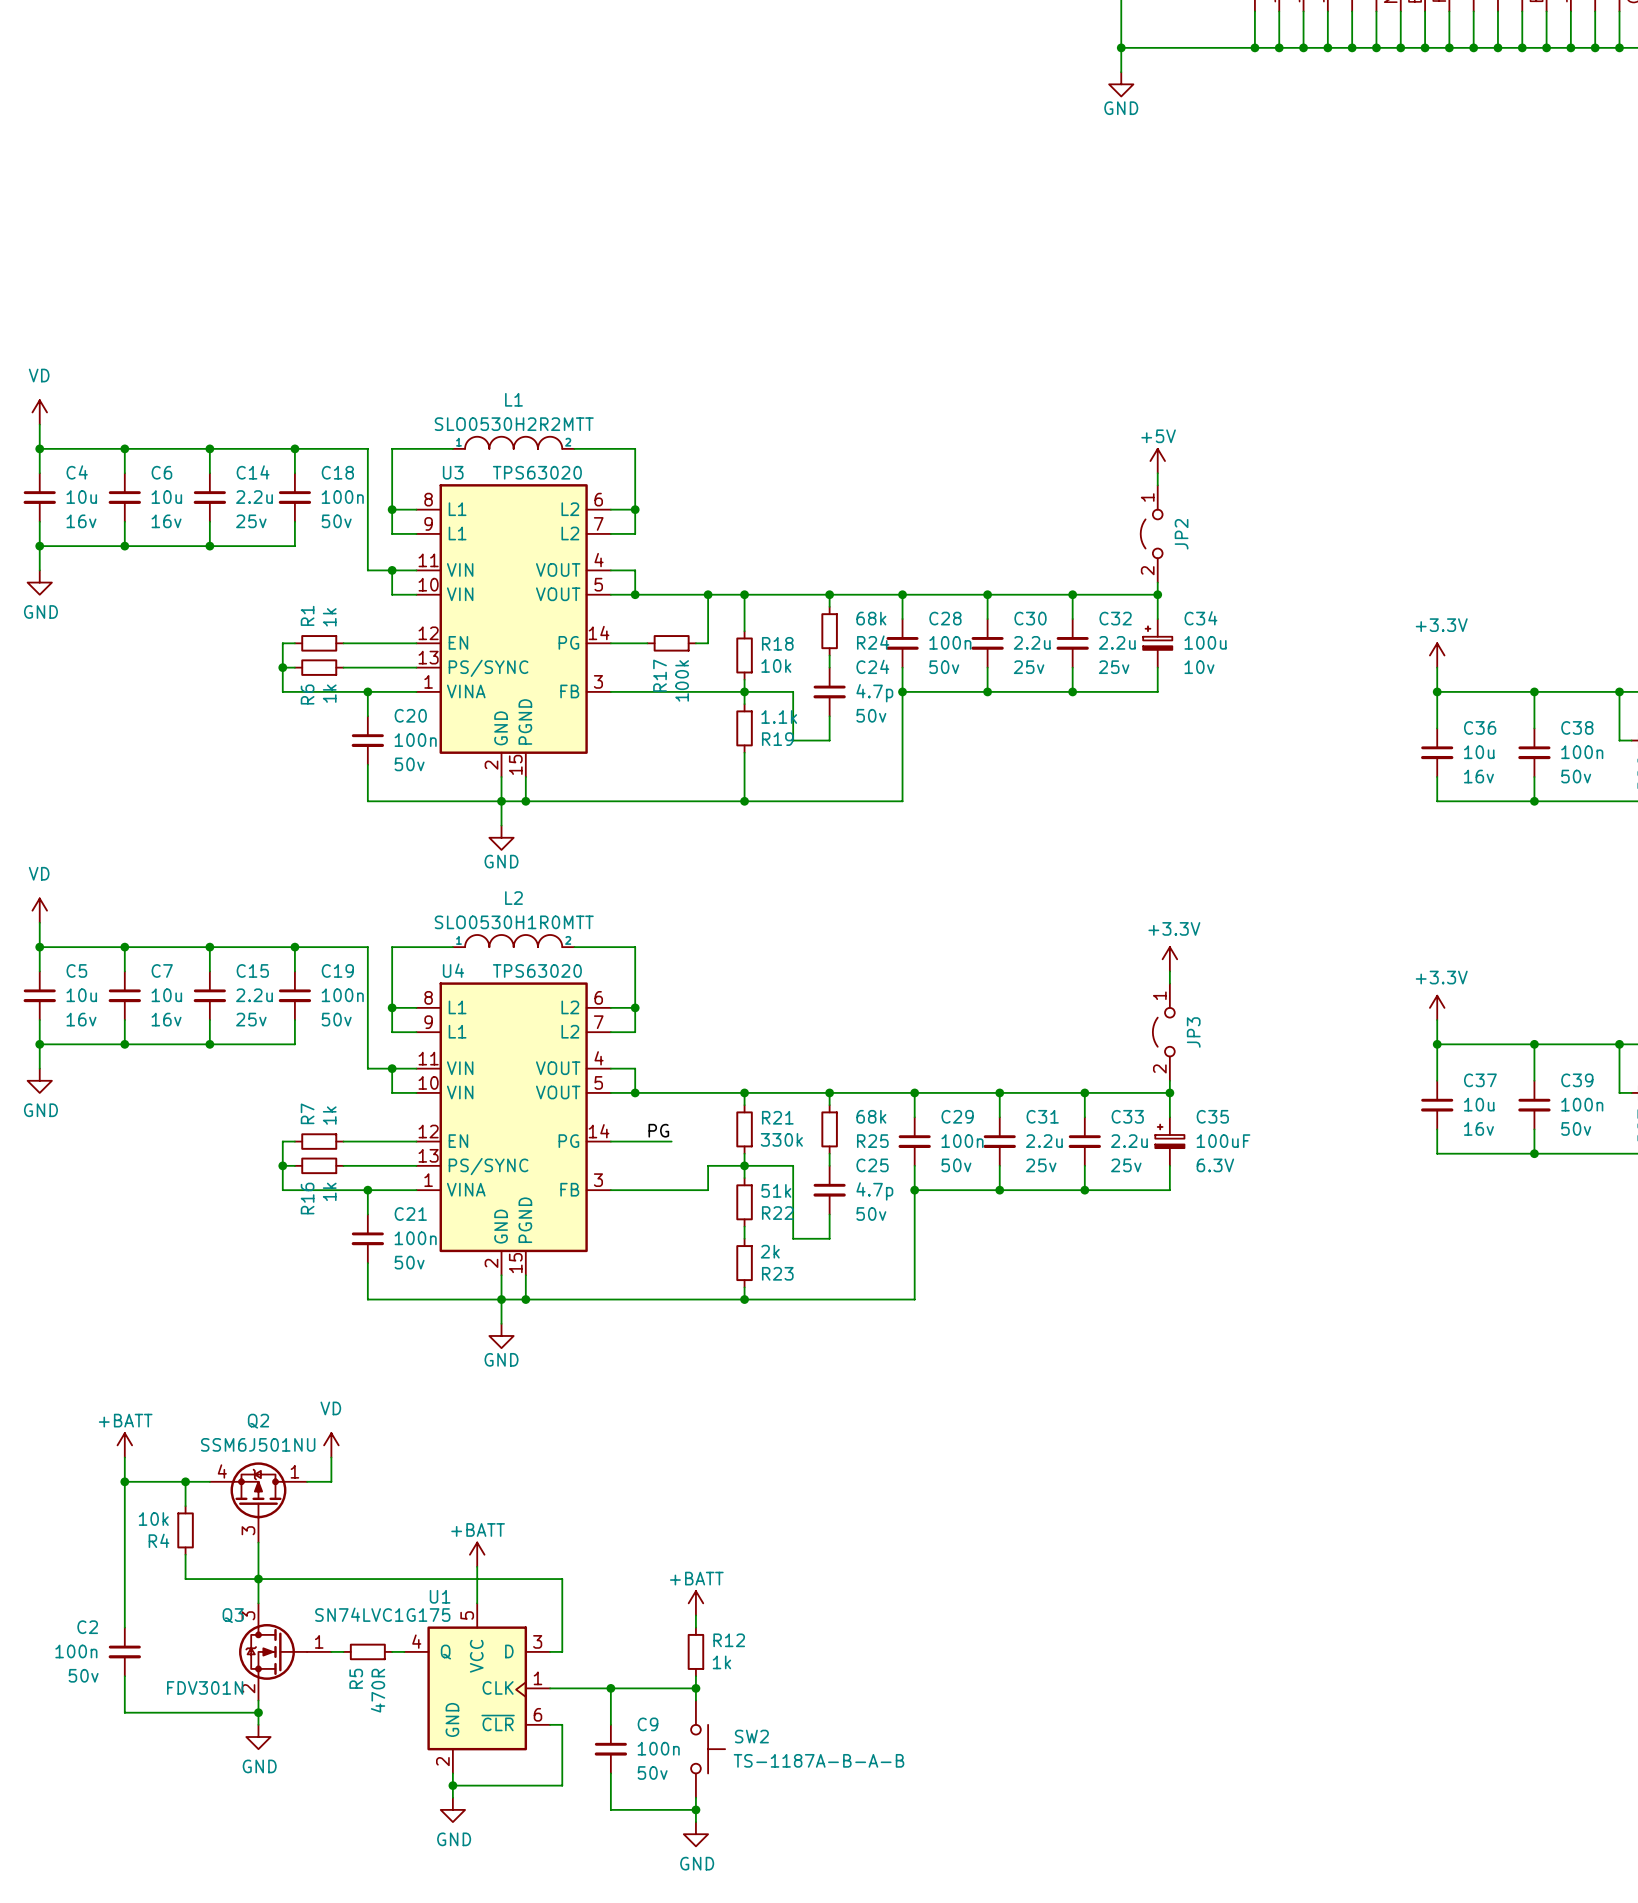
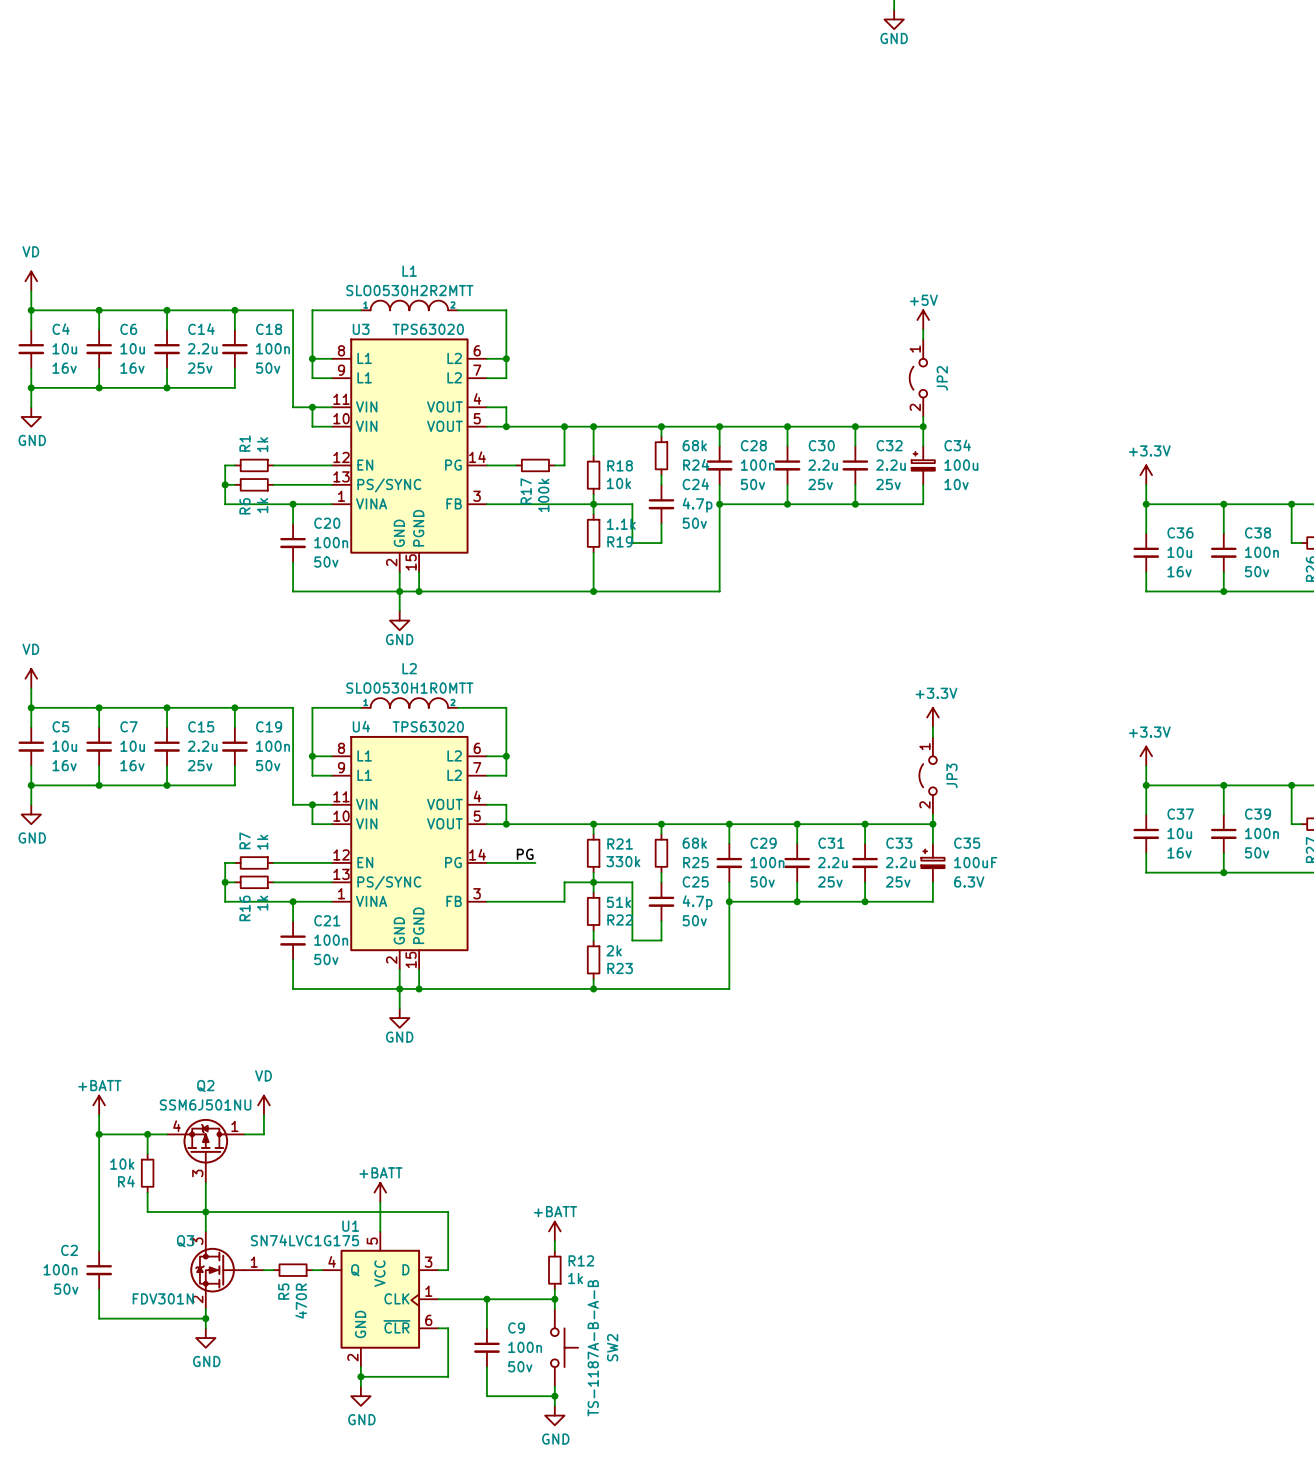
SW2 name rotation: 0° (751, 1736) -> 90° counterclockwise (612, 1347)
SW2 value rotation: 0° (819, 1760) -> 90° counterclockwise (593, 1348)

